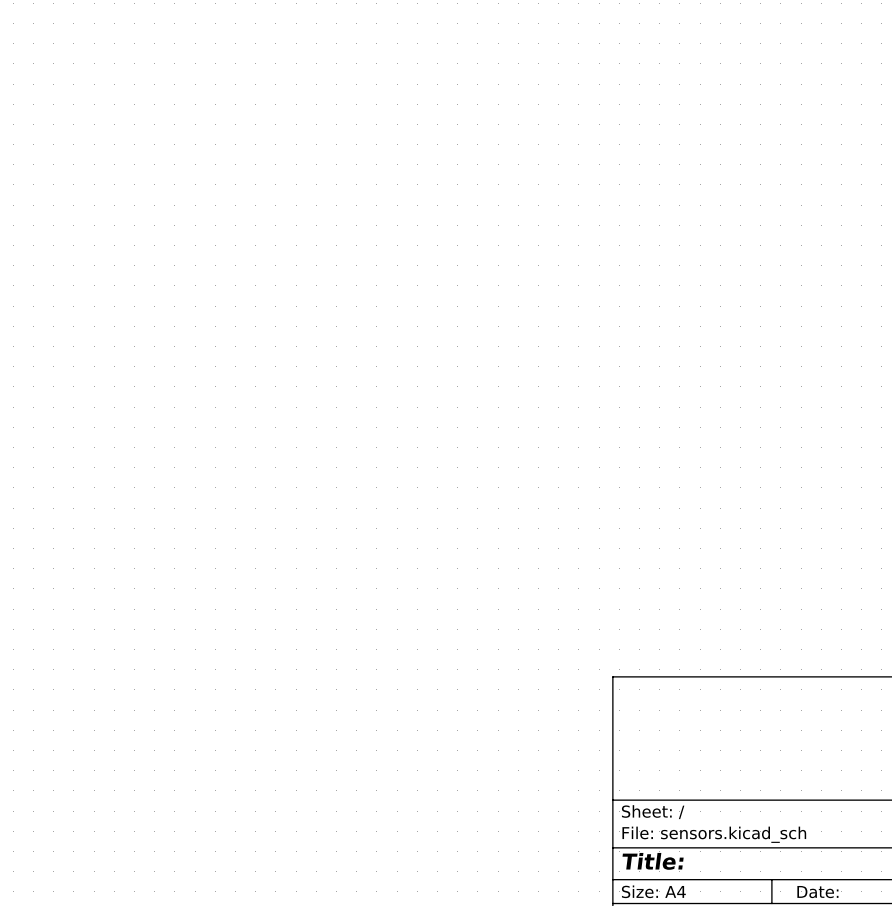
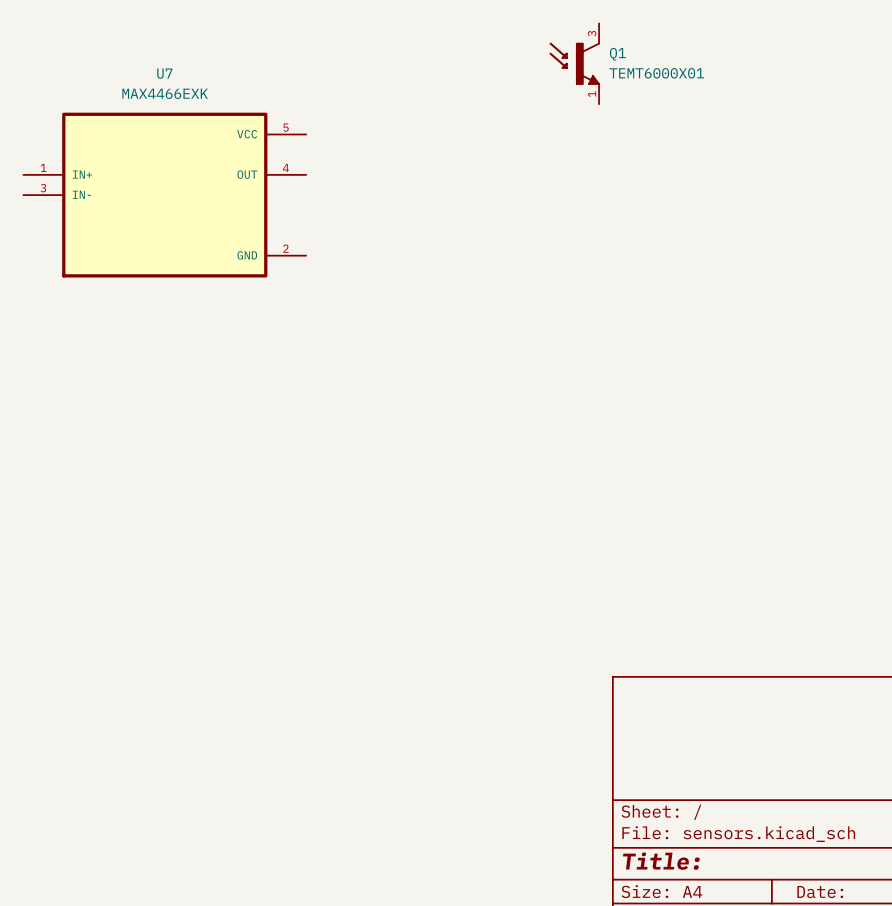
Q1: none -> TEMT6000X01 (574, 63)
U7: none -> MAX4466EXK (164, 195)

